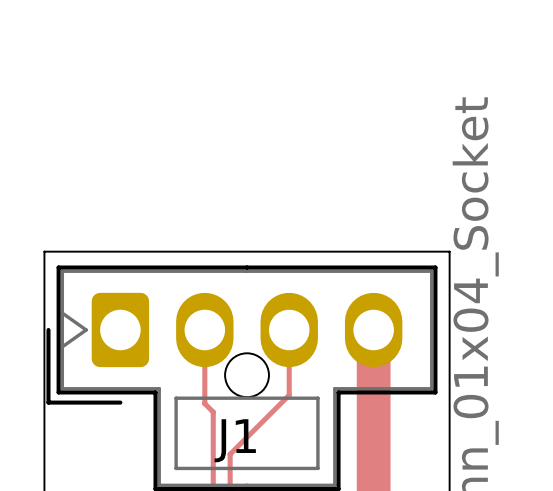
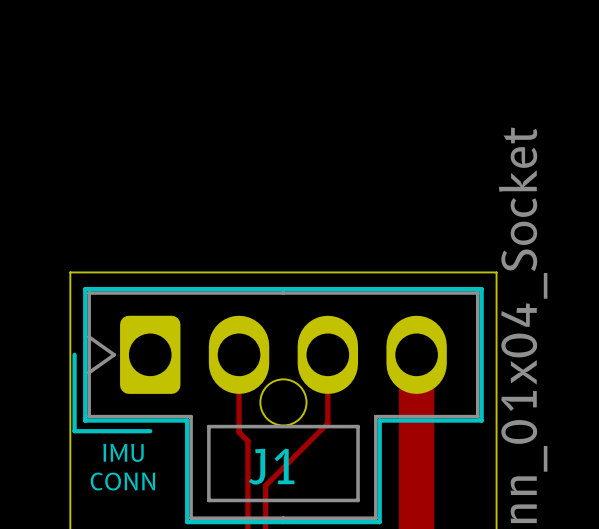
text: none -> IMU (123, 452)
text: none -> CONN (122, 481)

